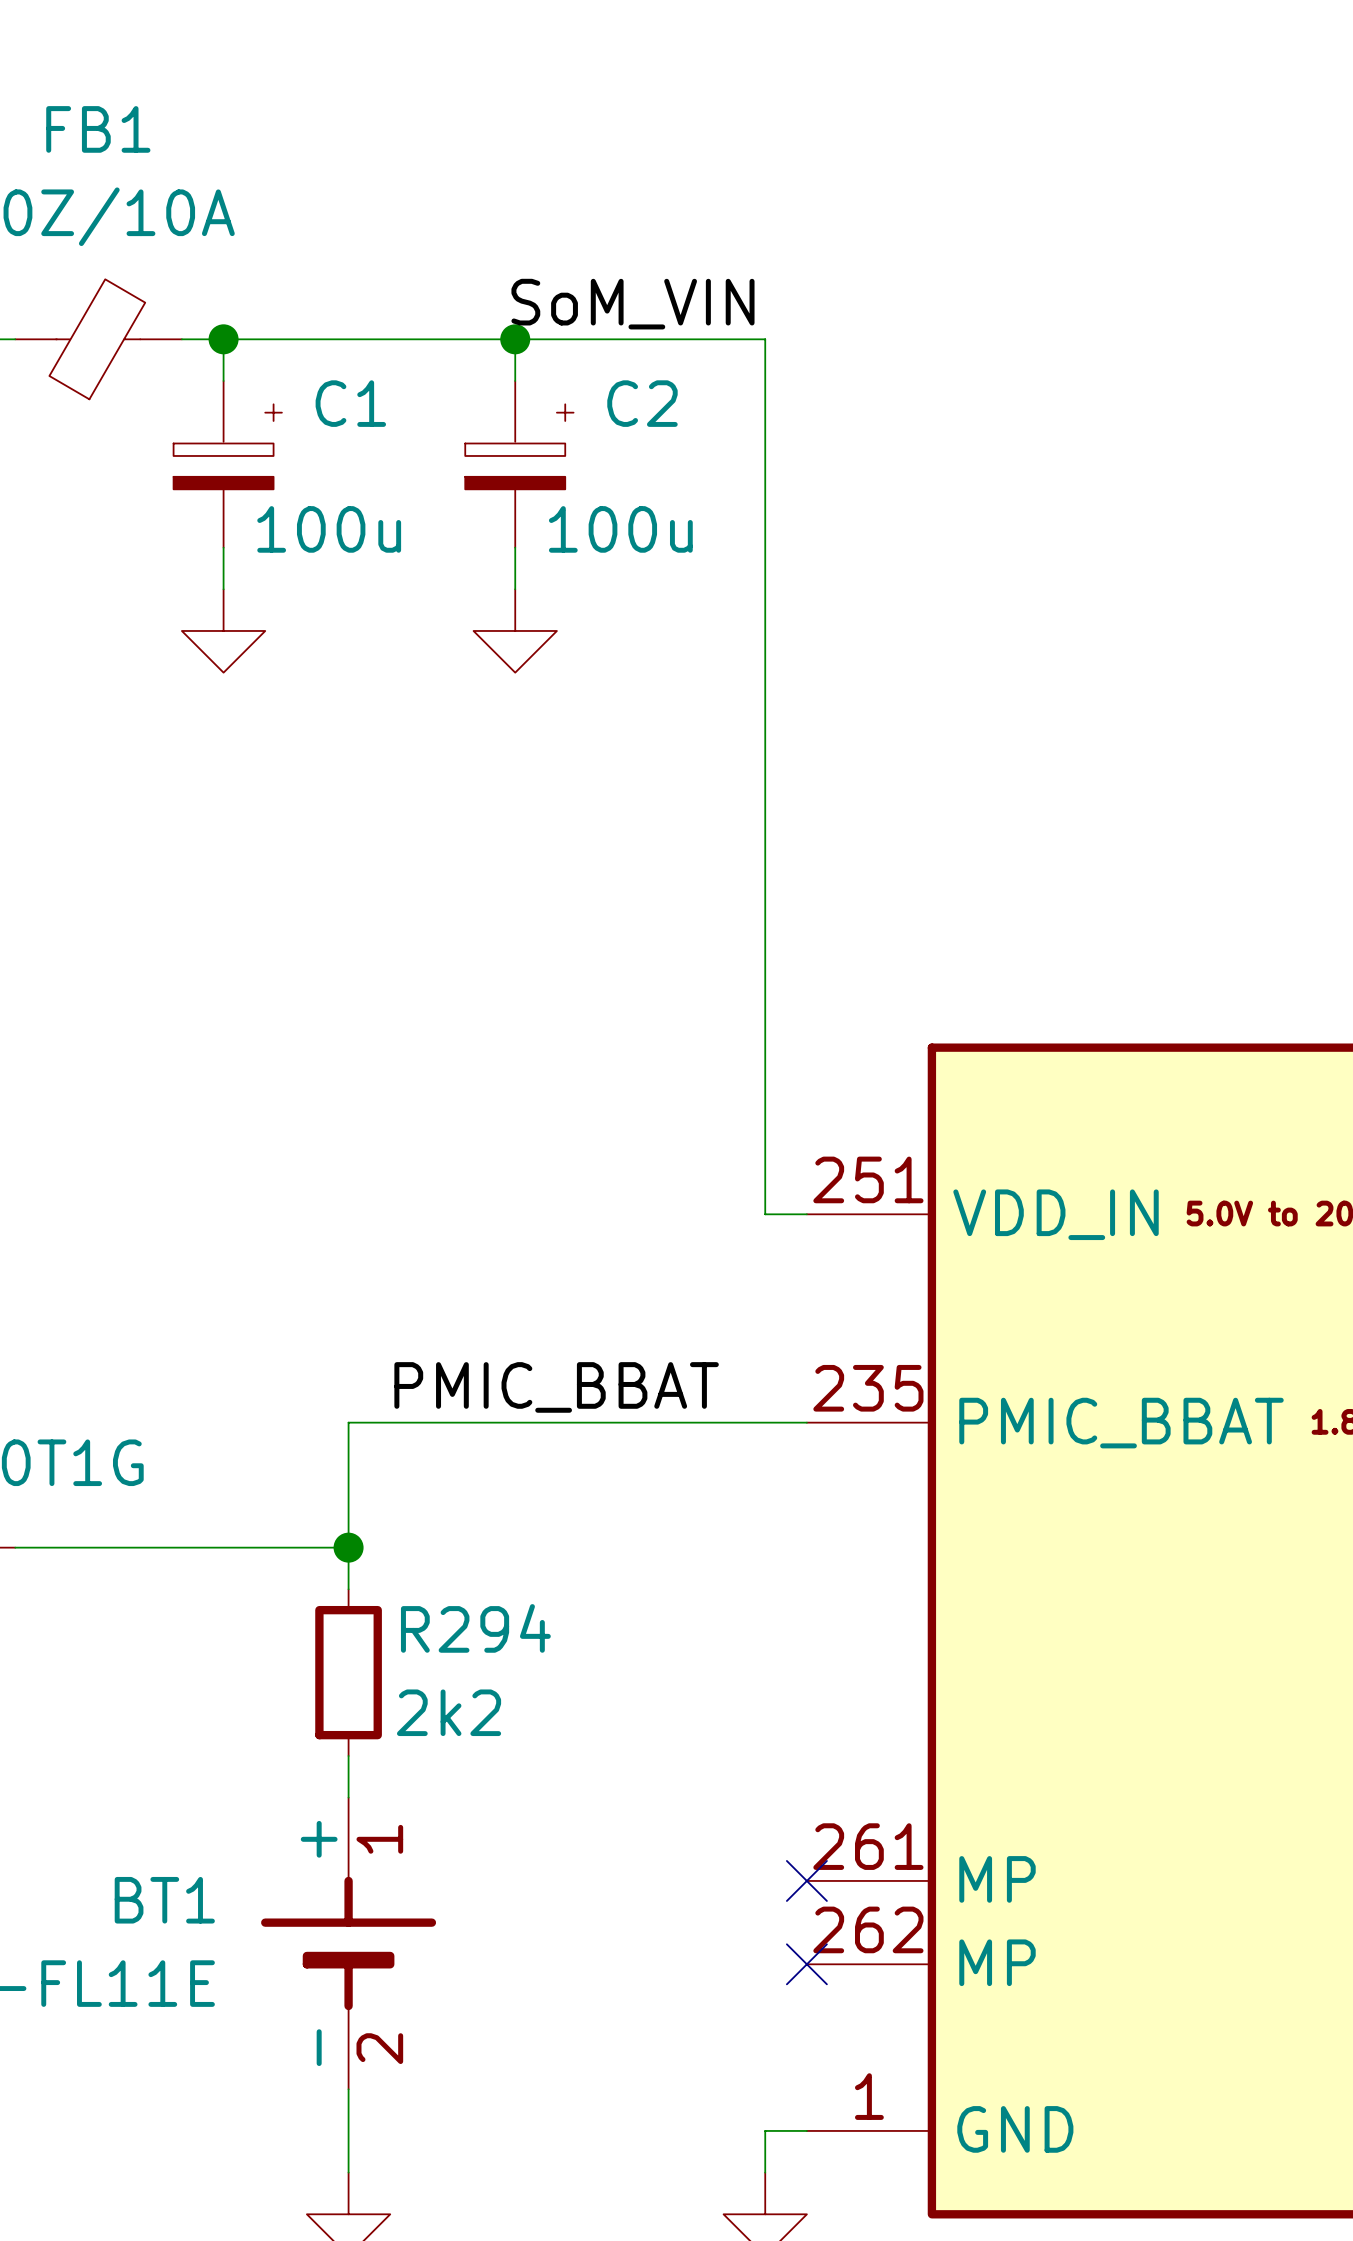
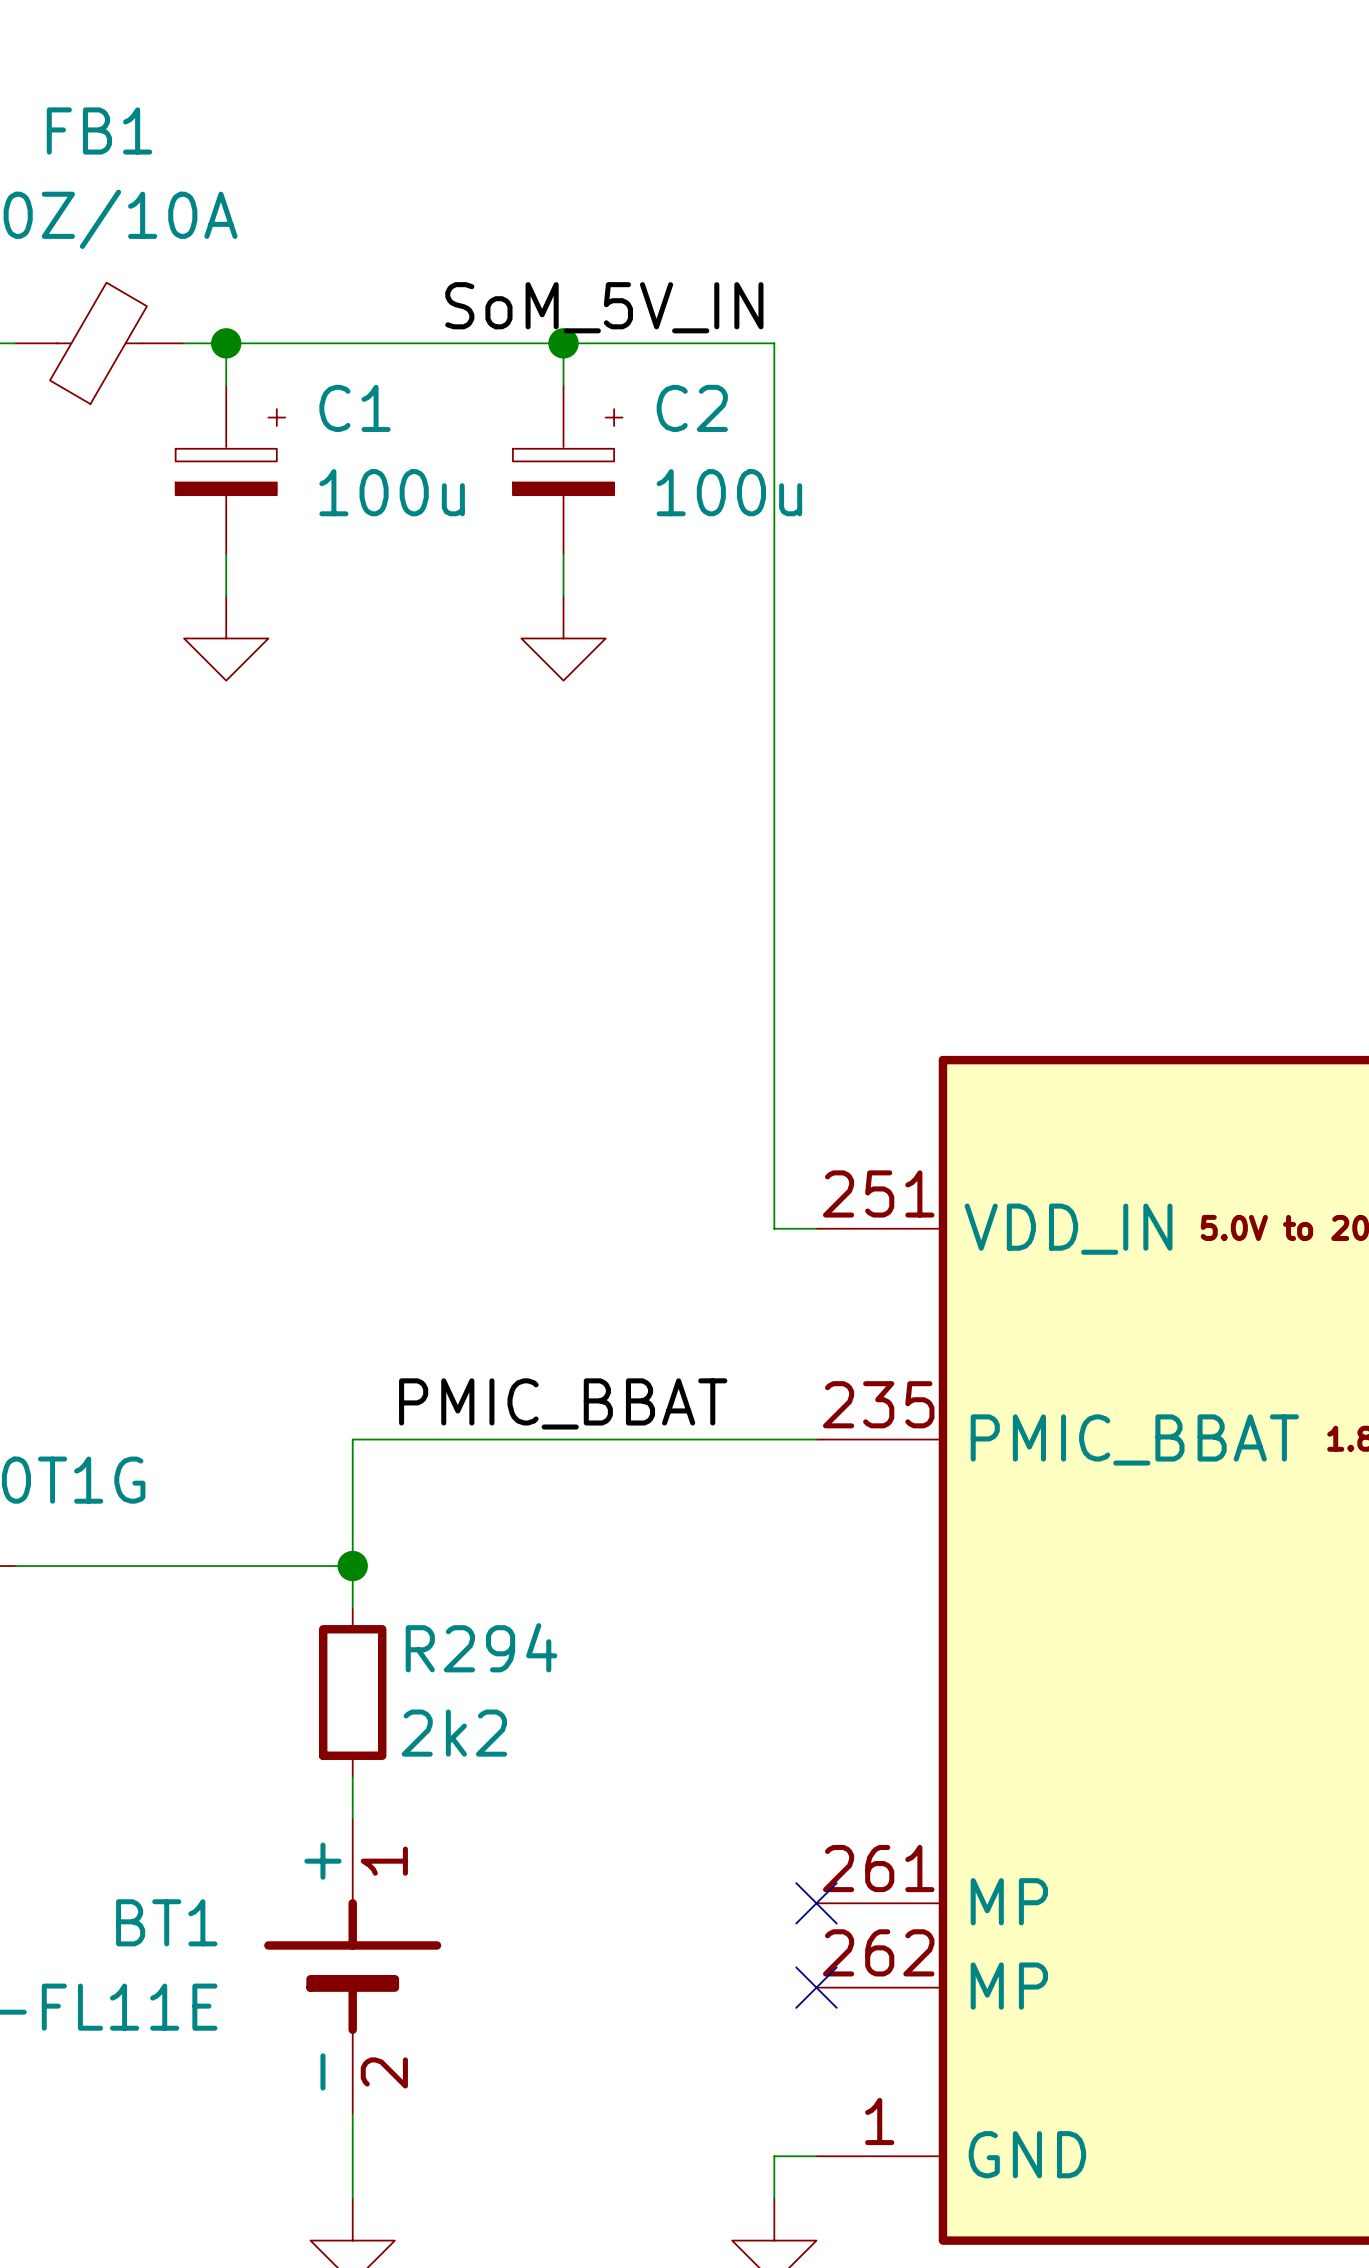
label: SoM_VIN (632, 304) -> SoM_5V_IN (604, 307)
wire: (515, 339) (515, 380) -> (563, 343) (563, 385)
junction position: (515, 339) -> (563, 343)
C2 position: (519, 464) -> (567, 469)
C1 text position: 100u (329, 529) -> 100u (392, 492)
C2 text position: 100u (620, 529) -> 100u (729, 492)
wire: (515, 547) (515, 589) -> (563, 554) (563, 596)
power symbol position: (515, 630) -> (563, 638)

